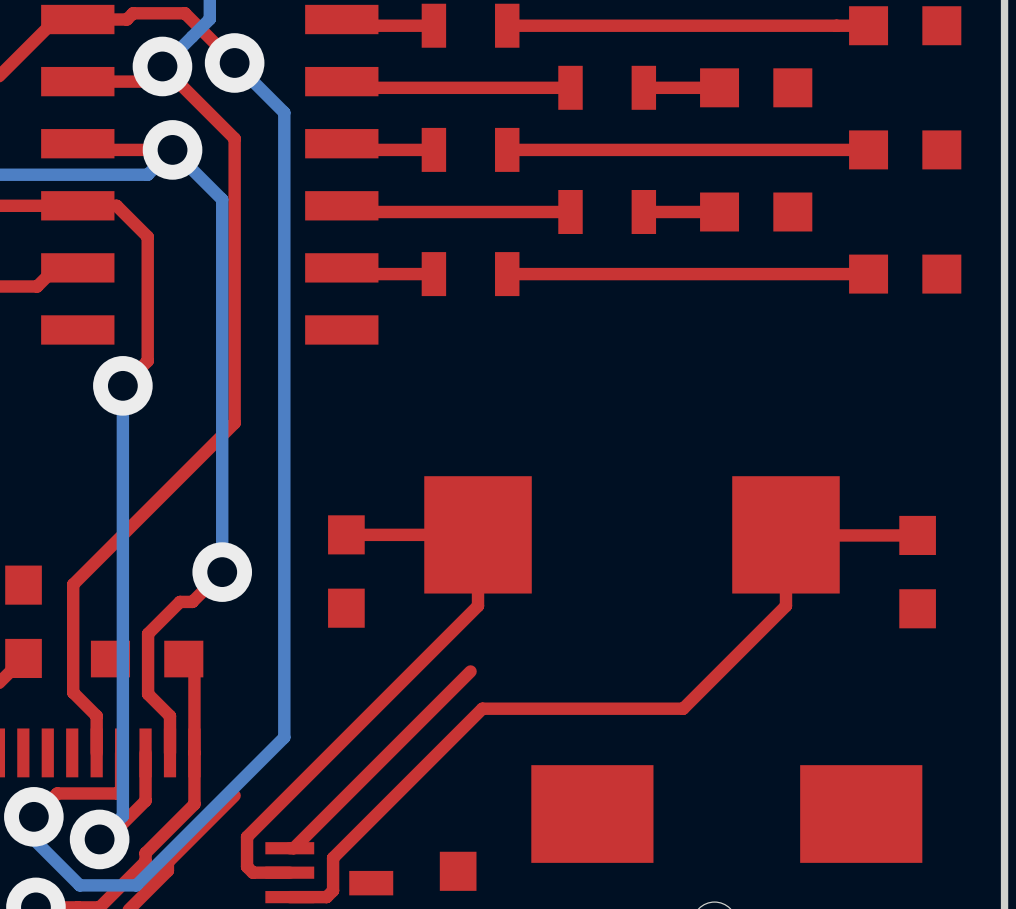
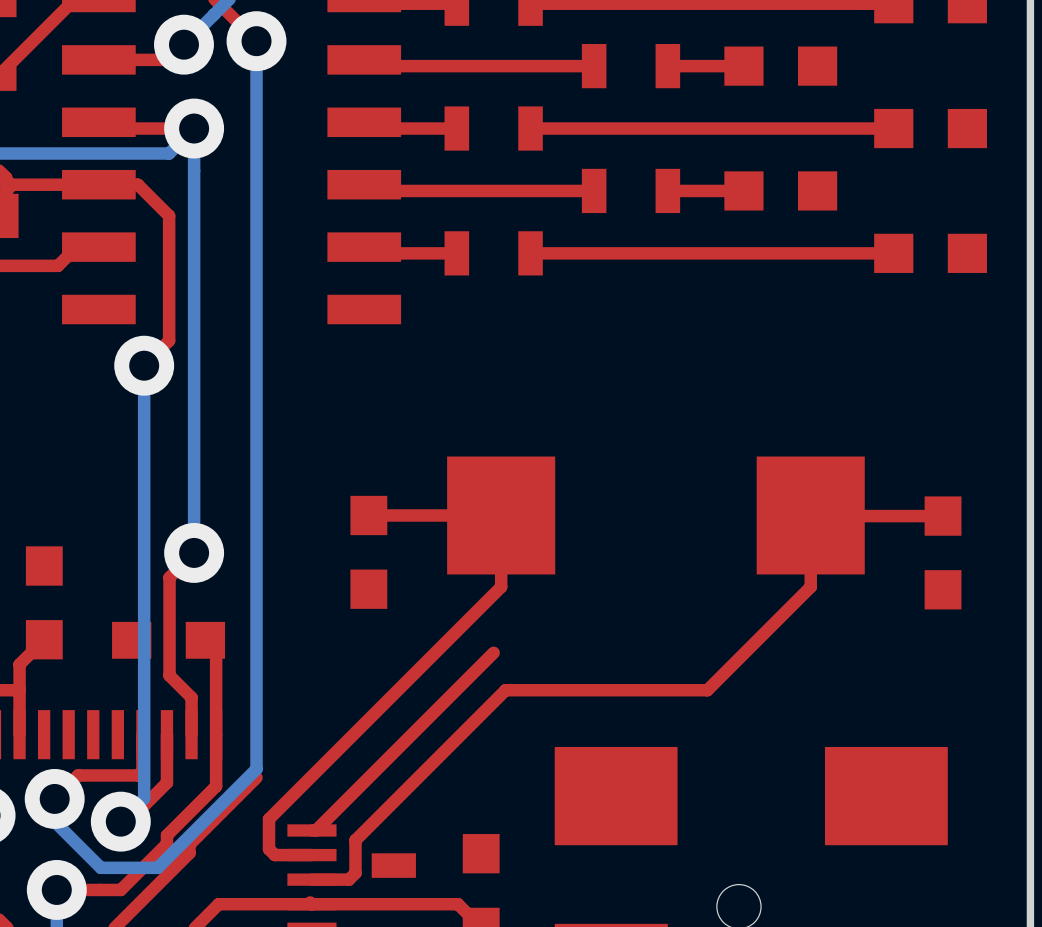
bottom track: (234, 62) (284, 112) (284, 737) (234, 787) -> (256, 41) (256, 769)
top track: (162, 66) (234, 138) (234, 423) (73, 584) (73, 692) (96, 716) (96, 752) -> none
bottom track: (172, 149) (222, 199) (222, 572) -> (194, 128) (194, 552)
top track: (222, 572) (192, 601) (179, 601) (148, 633) -> (194, 552) (169, 577) (169, 614)
via position: (222, 572) -> (194, 552)

